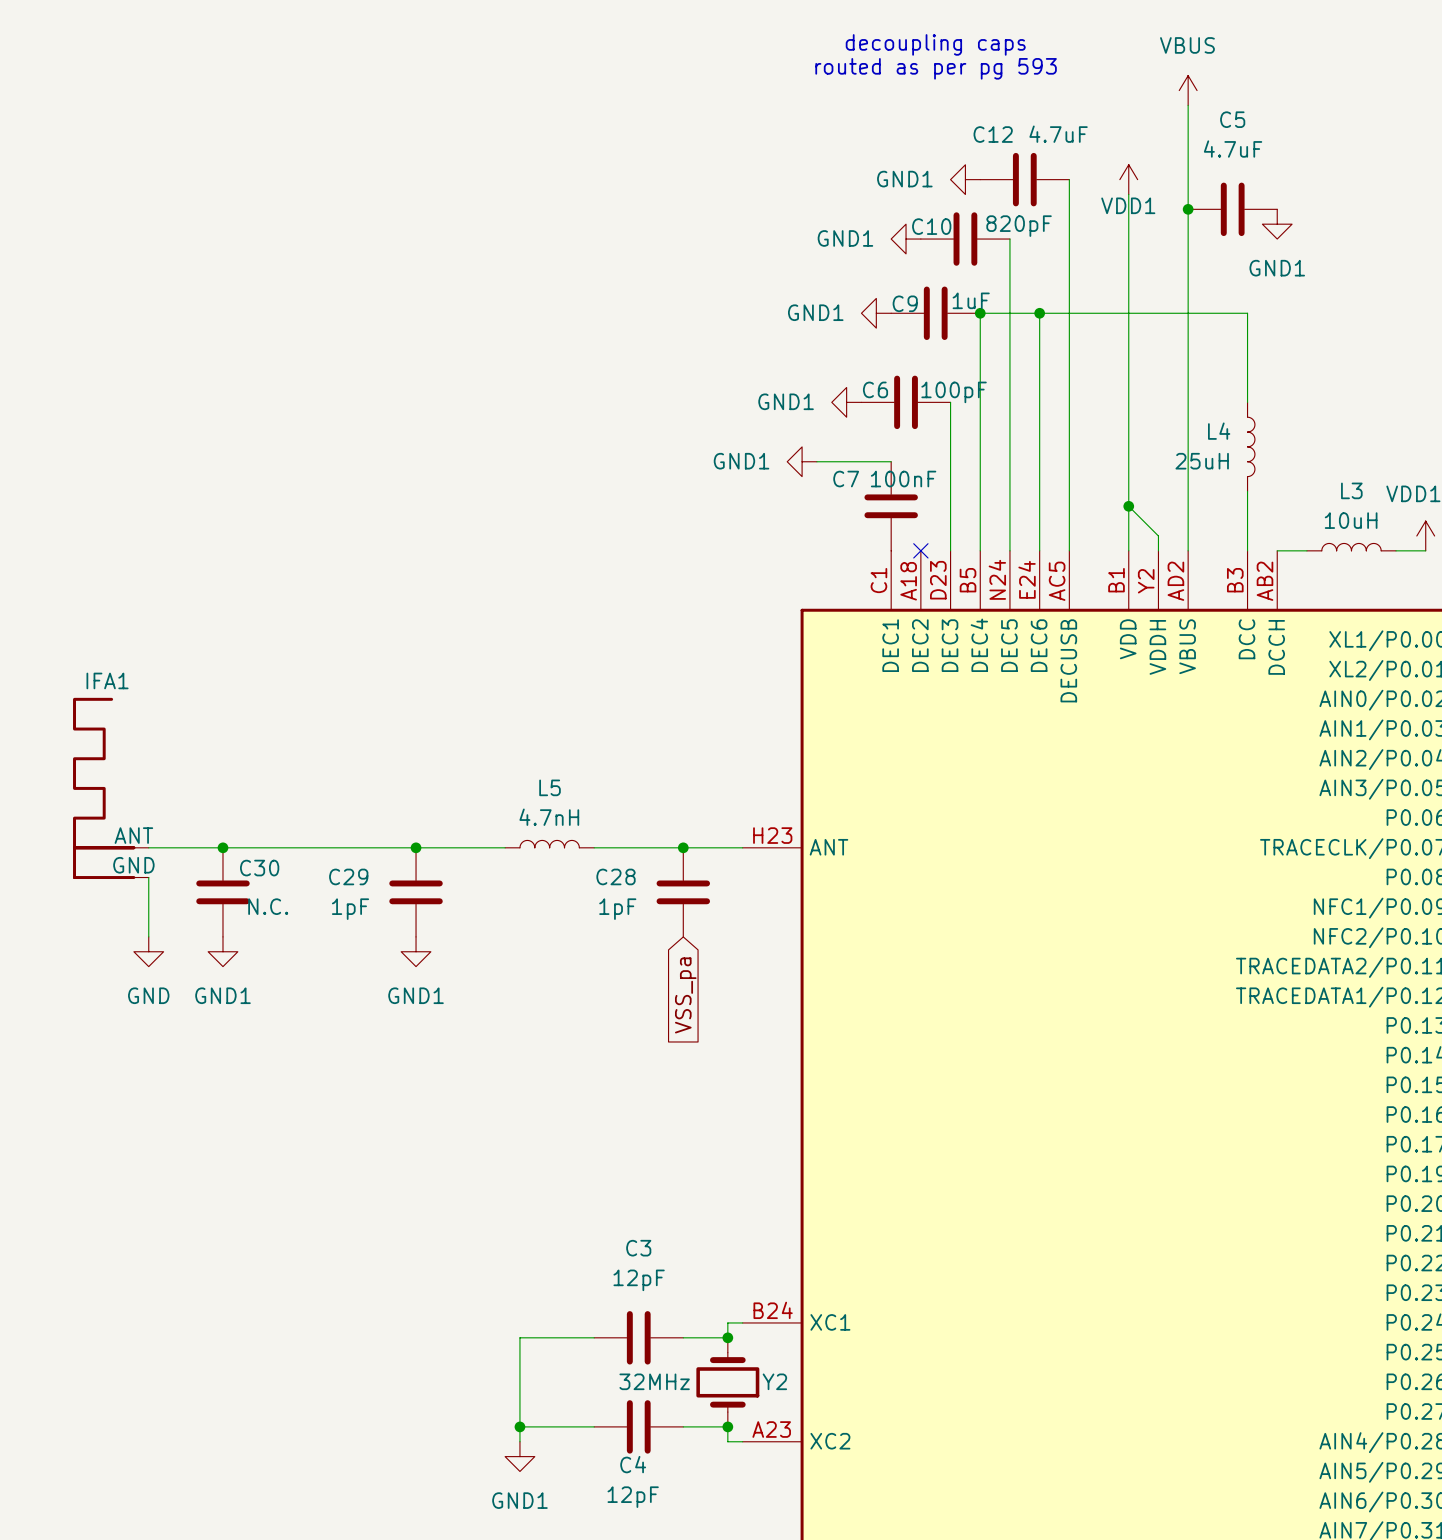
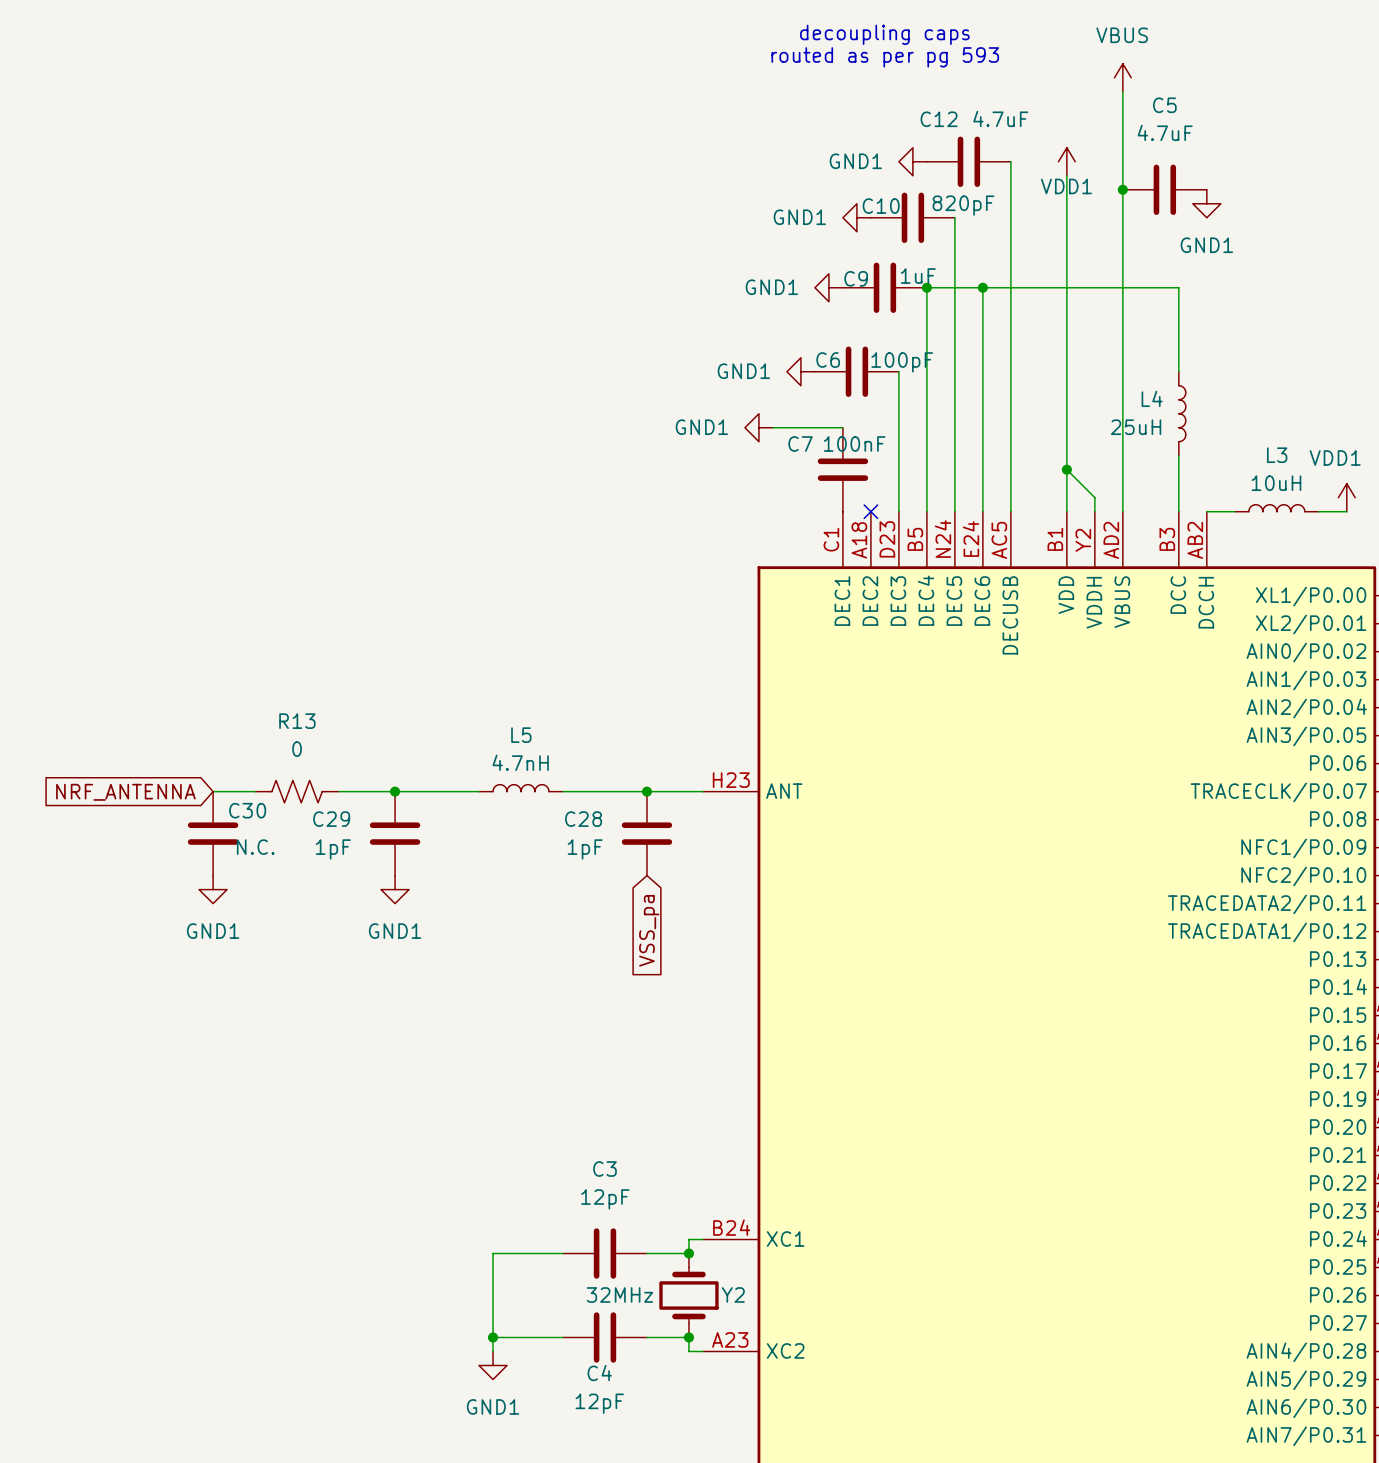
IFA1: (110, 788) -> none
wire: (148, 847) (222, 847) -> none
junction: (222, 847) -> none
wire: (267, 847) (356, 847) -> none
R13: none -> 0 (297, 791)
global label: none -> NRF_ANTENNA (125, 792)
wire: (148, 877) (148, 936) -> none
power symbol: GND (148, 951) -> none

